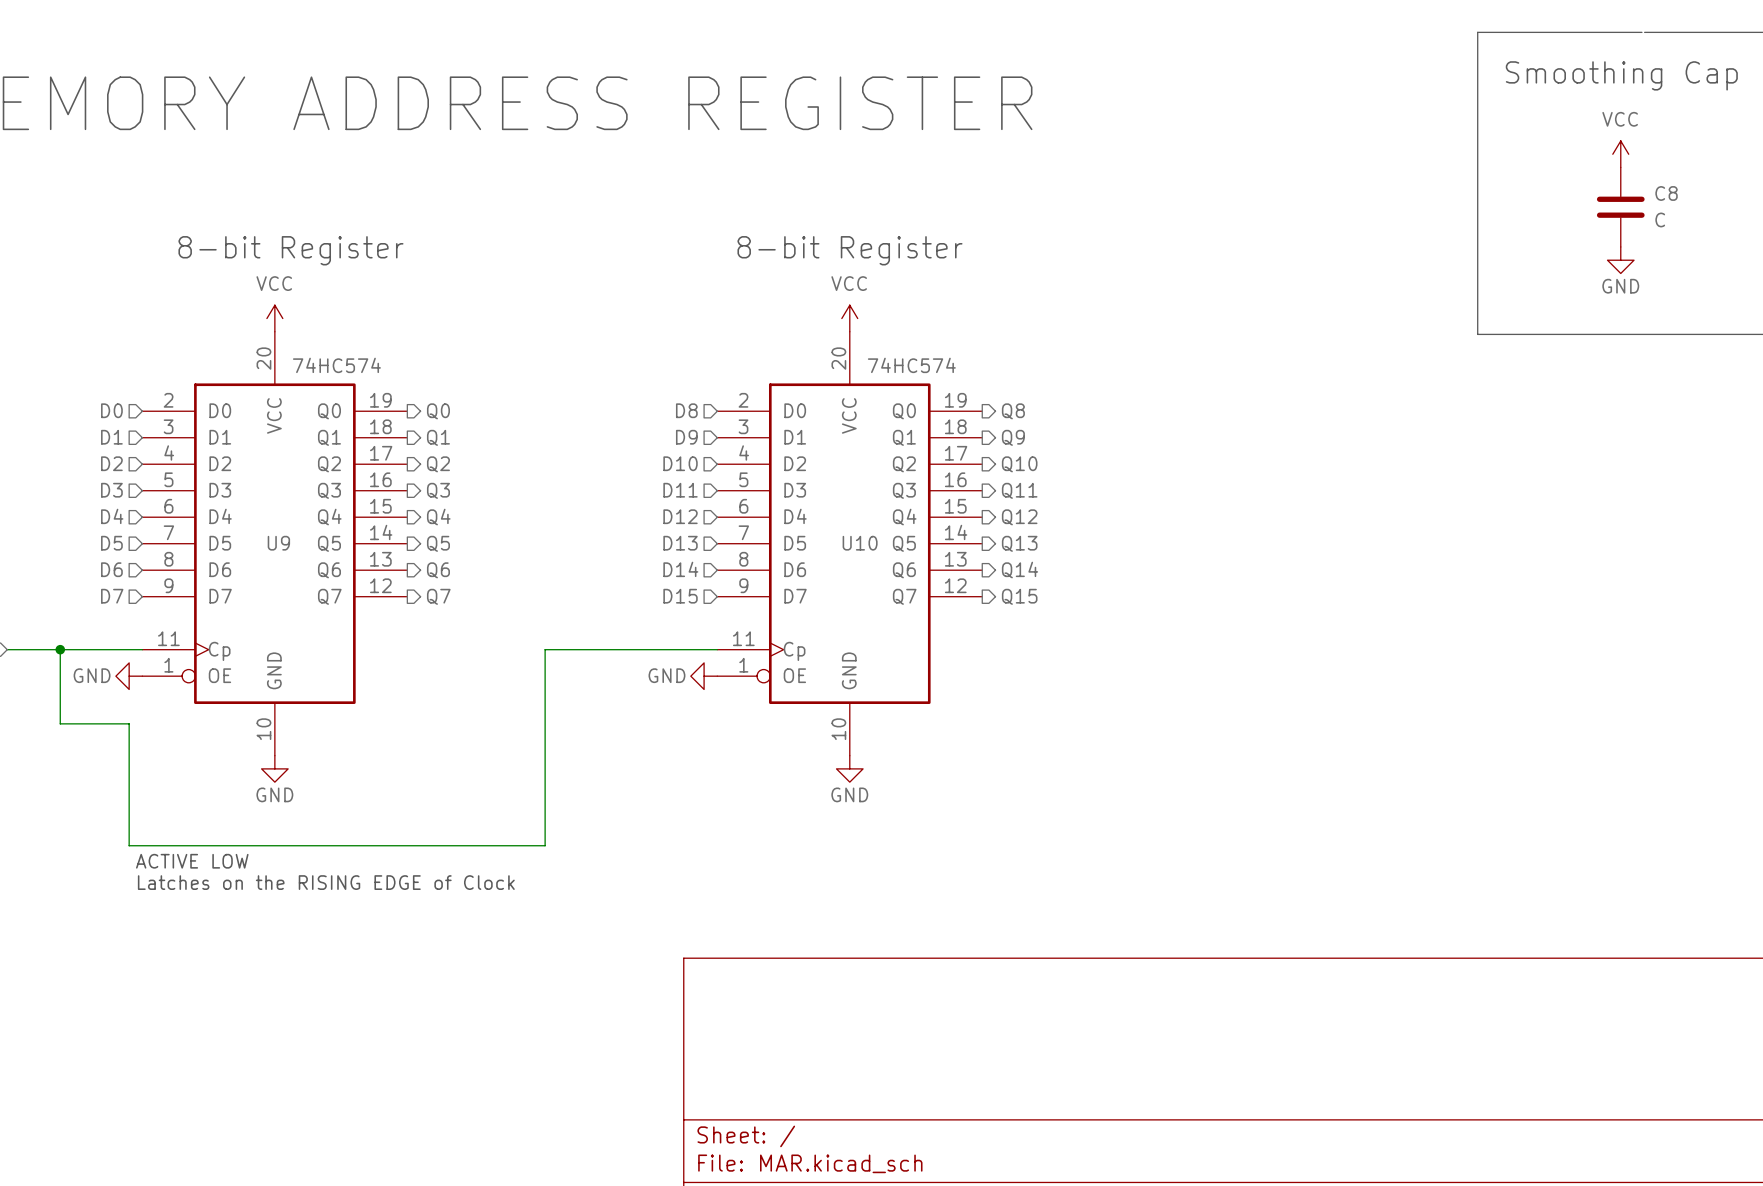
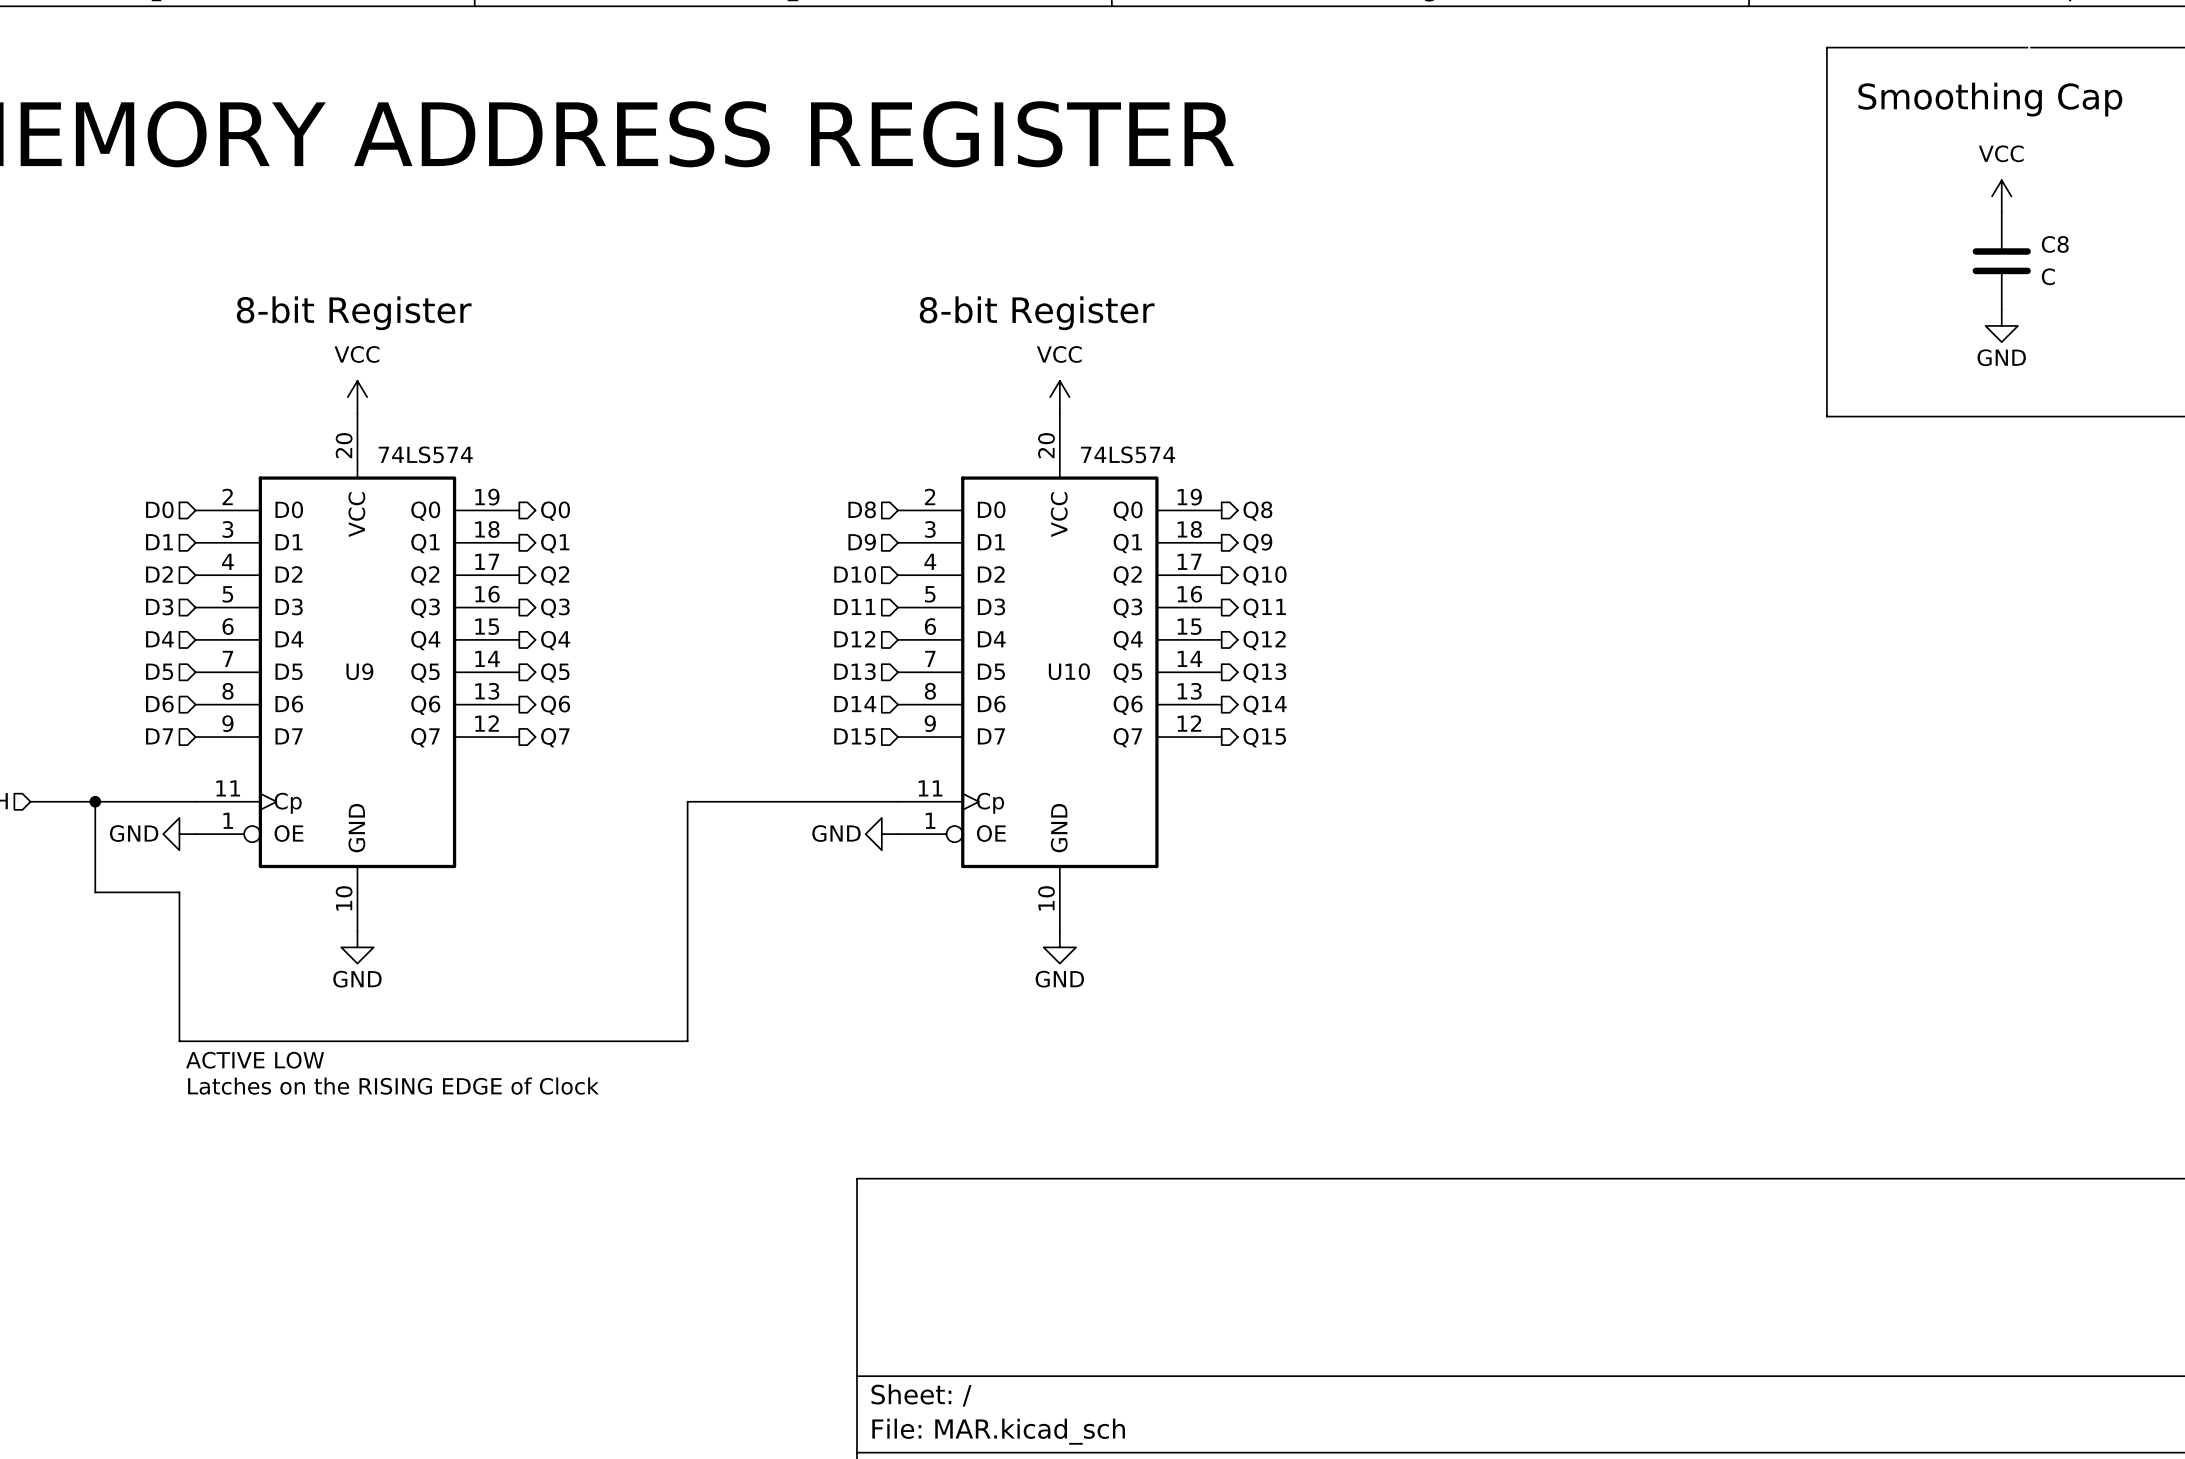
U9 value: 74HC574 (336, 365) -> 74LS574 (425, 454)
U10 value: 74HC574 (911, 365) -> 74LS574 (1128, 454)

